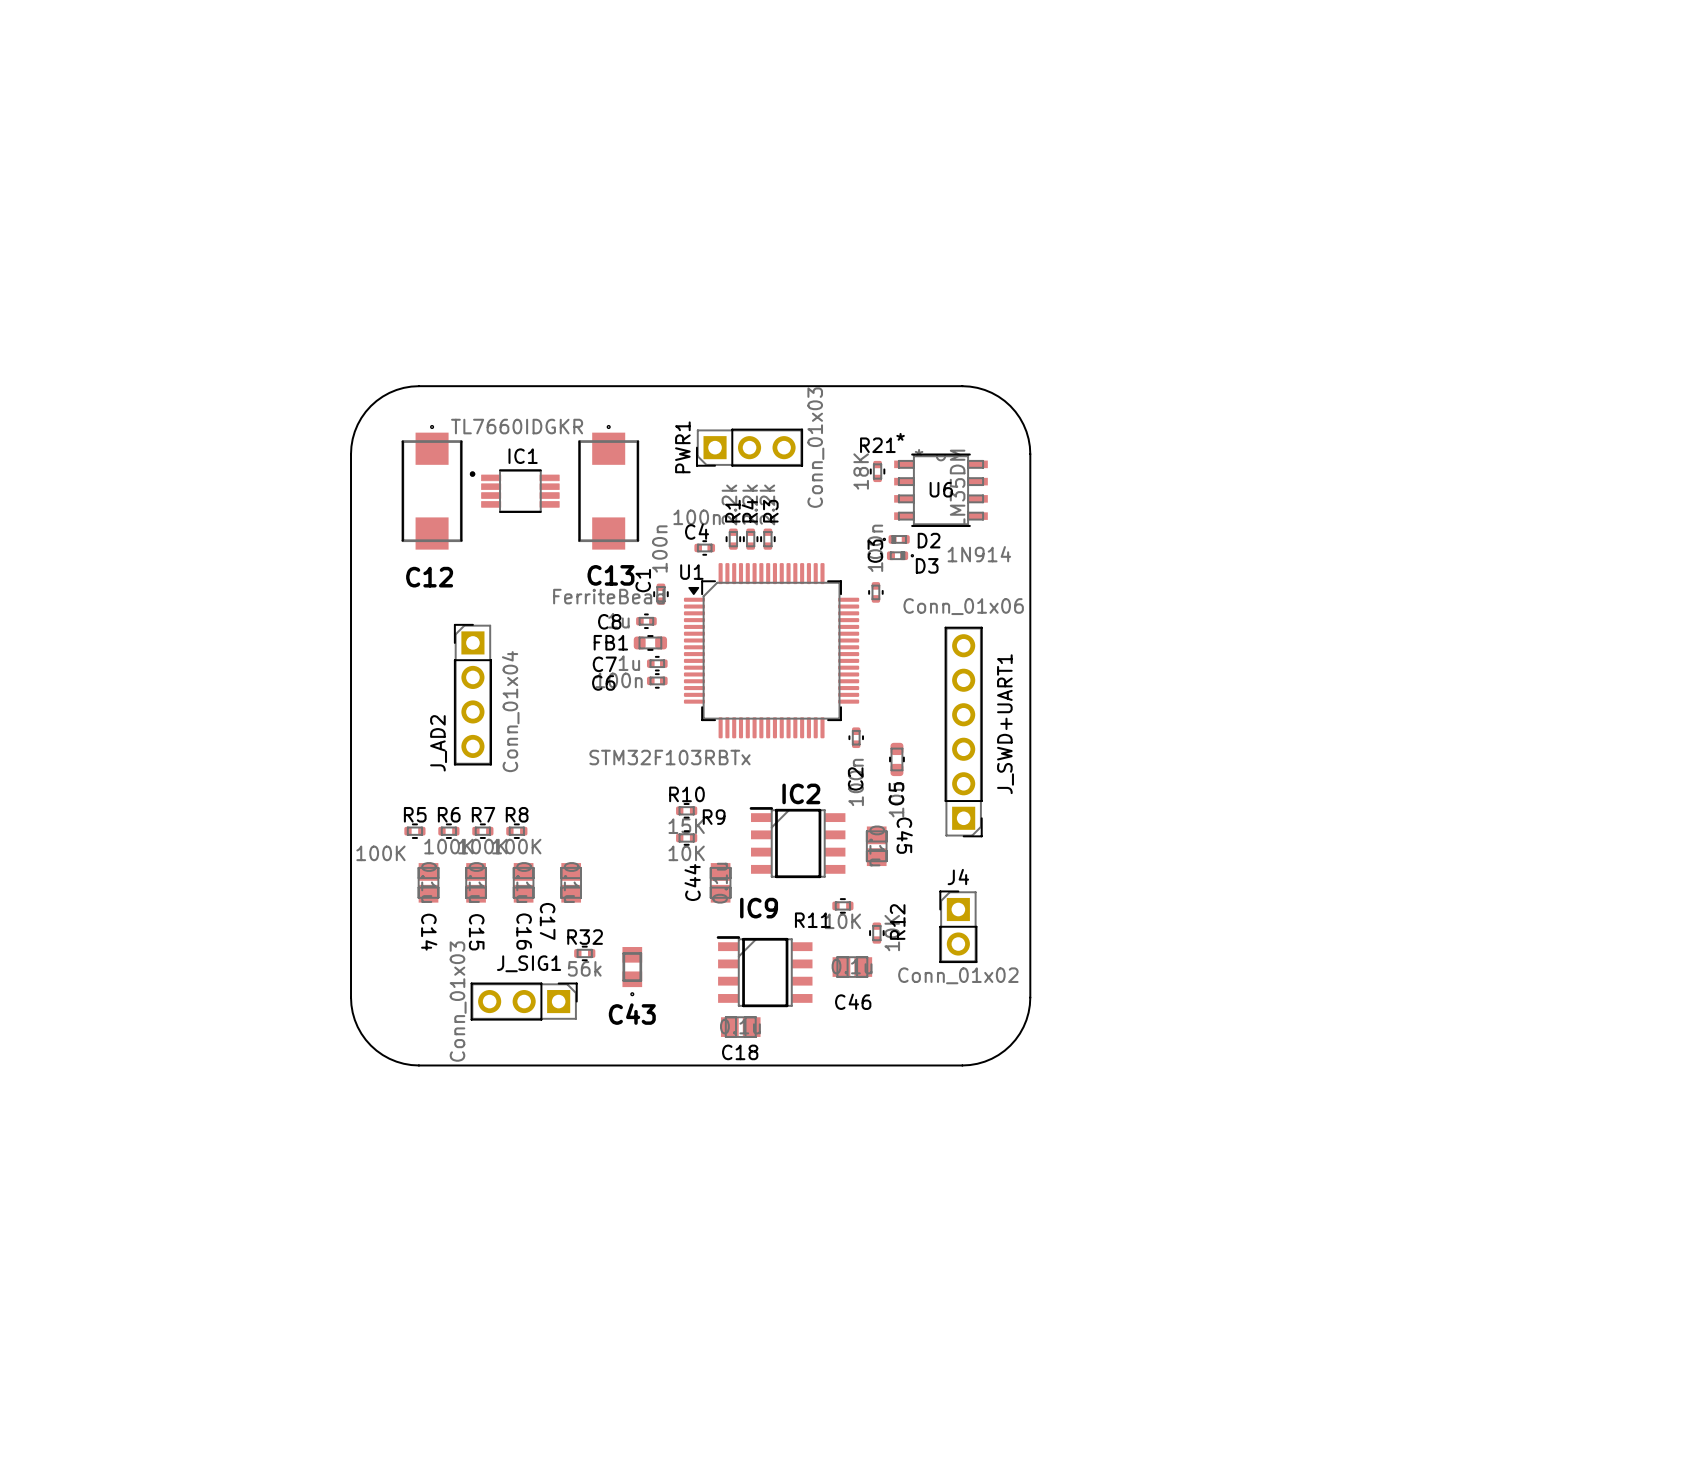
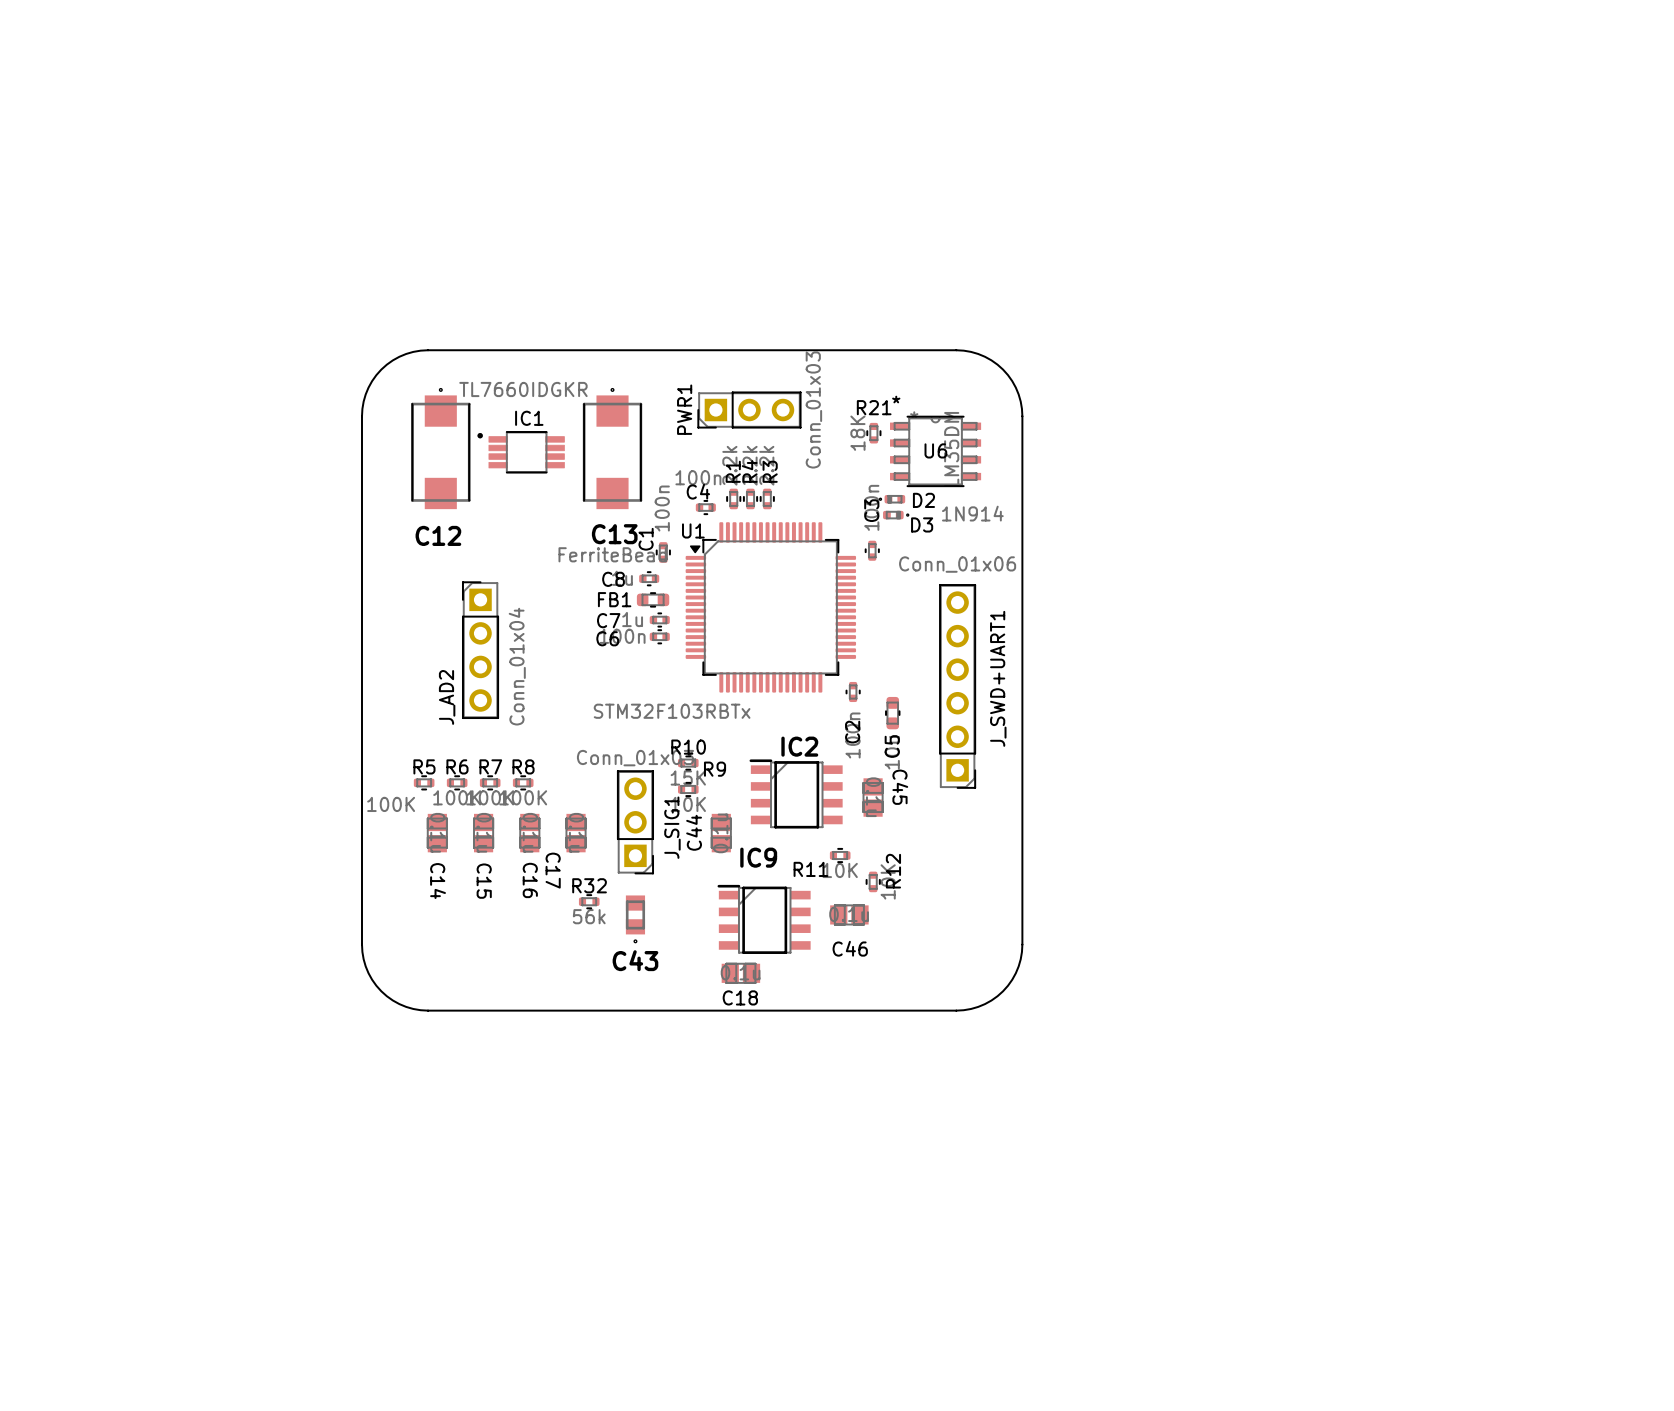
J4: Conn_01x02 (958, 926) -> none
J_SIG1 rotation: 0° (524, 1001) -> 90° clockwise (635, 822)
J_SIG1 position: (524, 1001) -> (635, 822)

